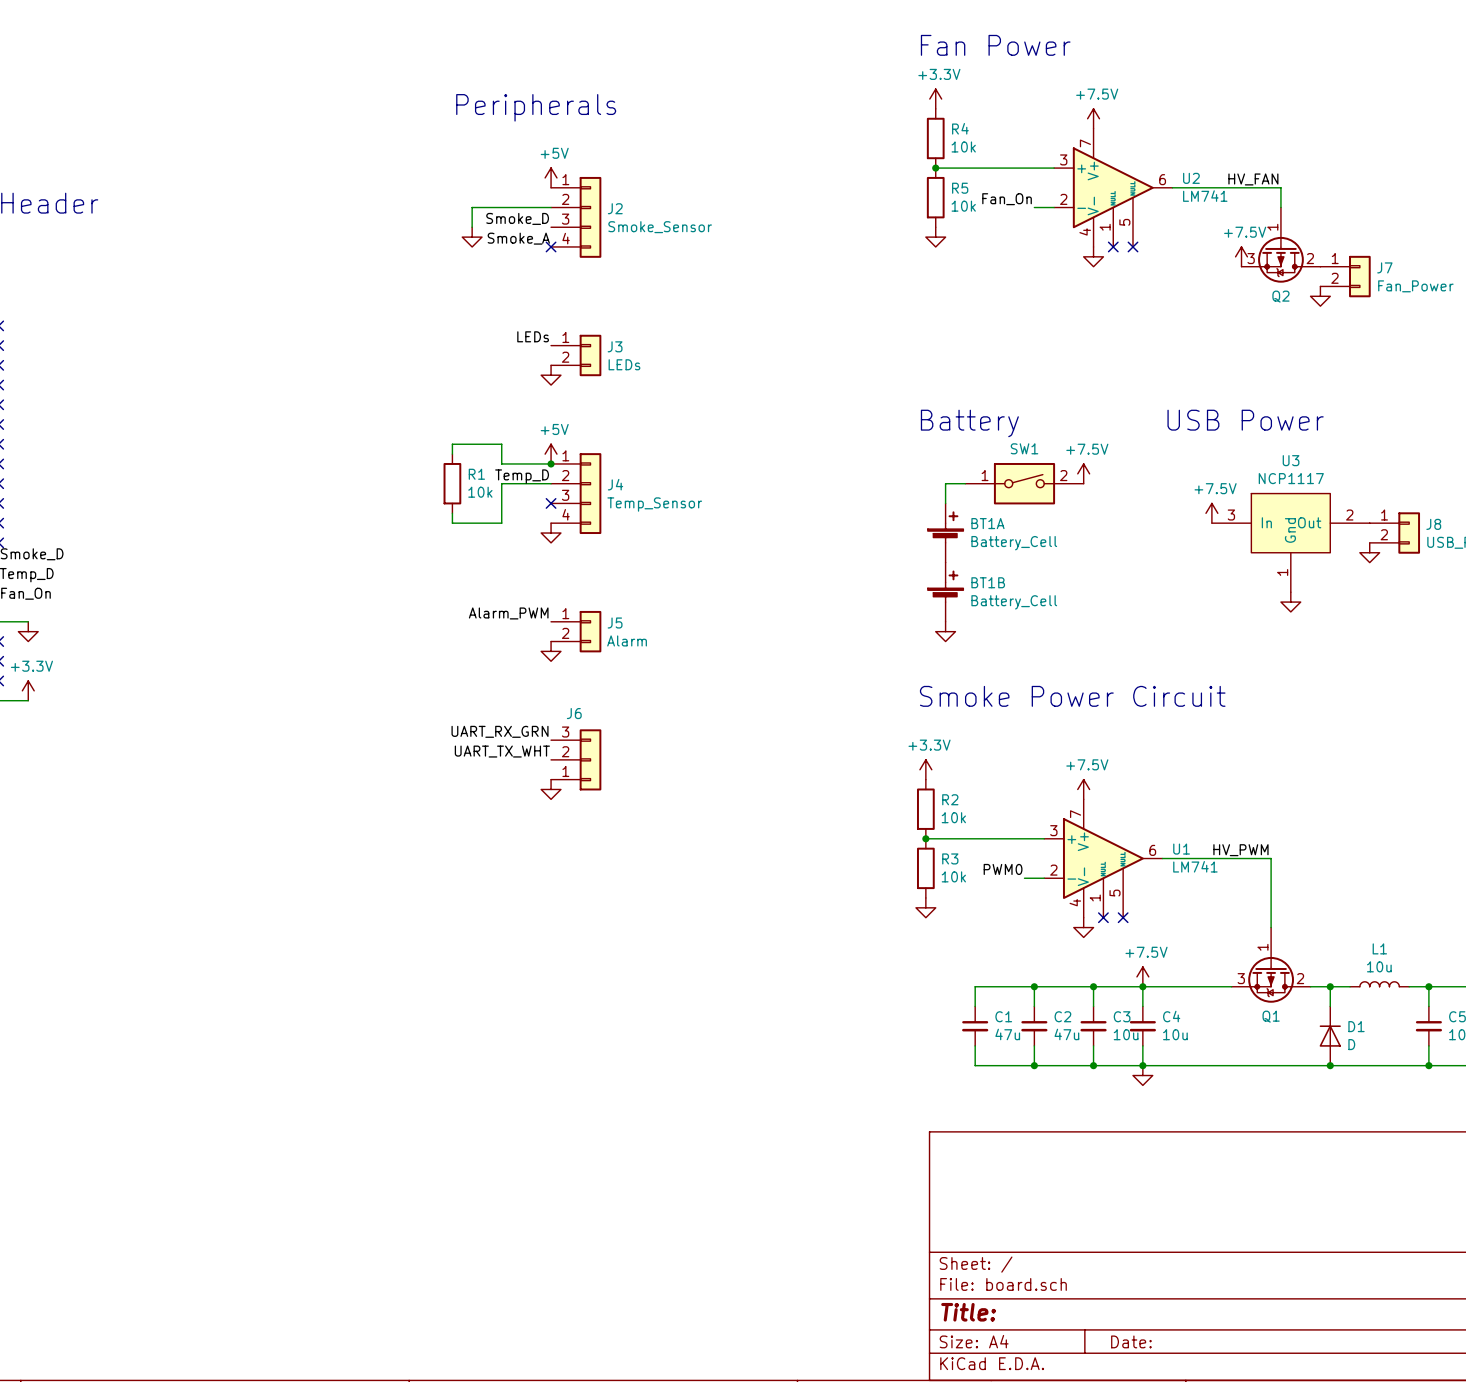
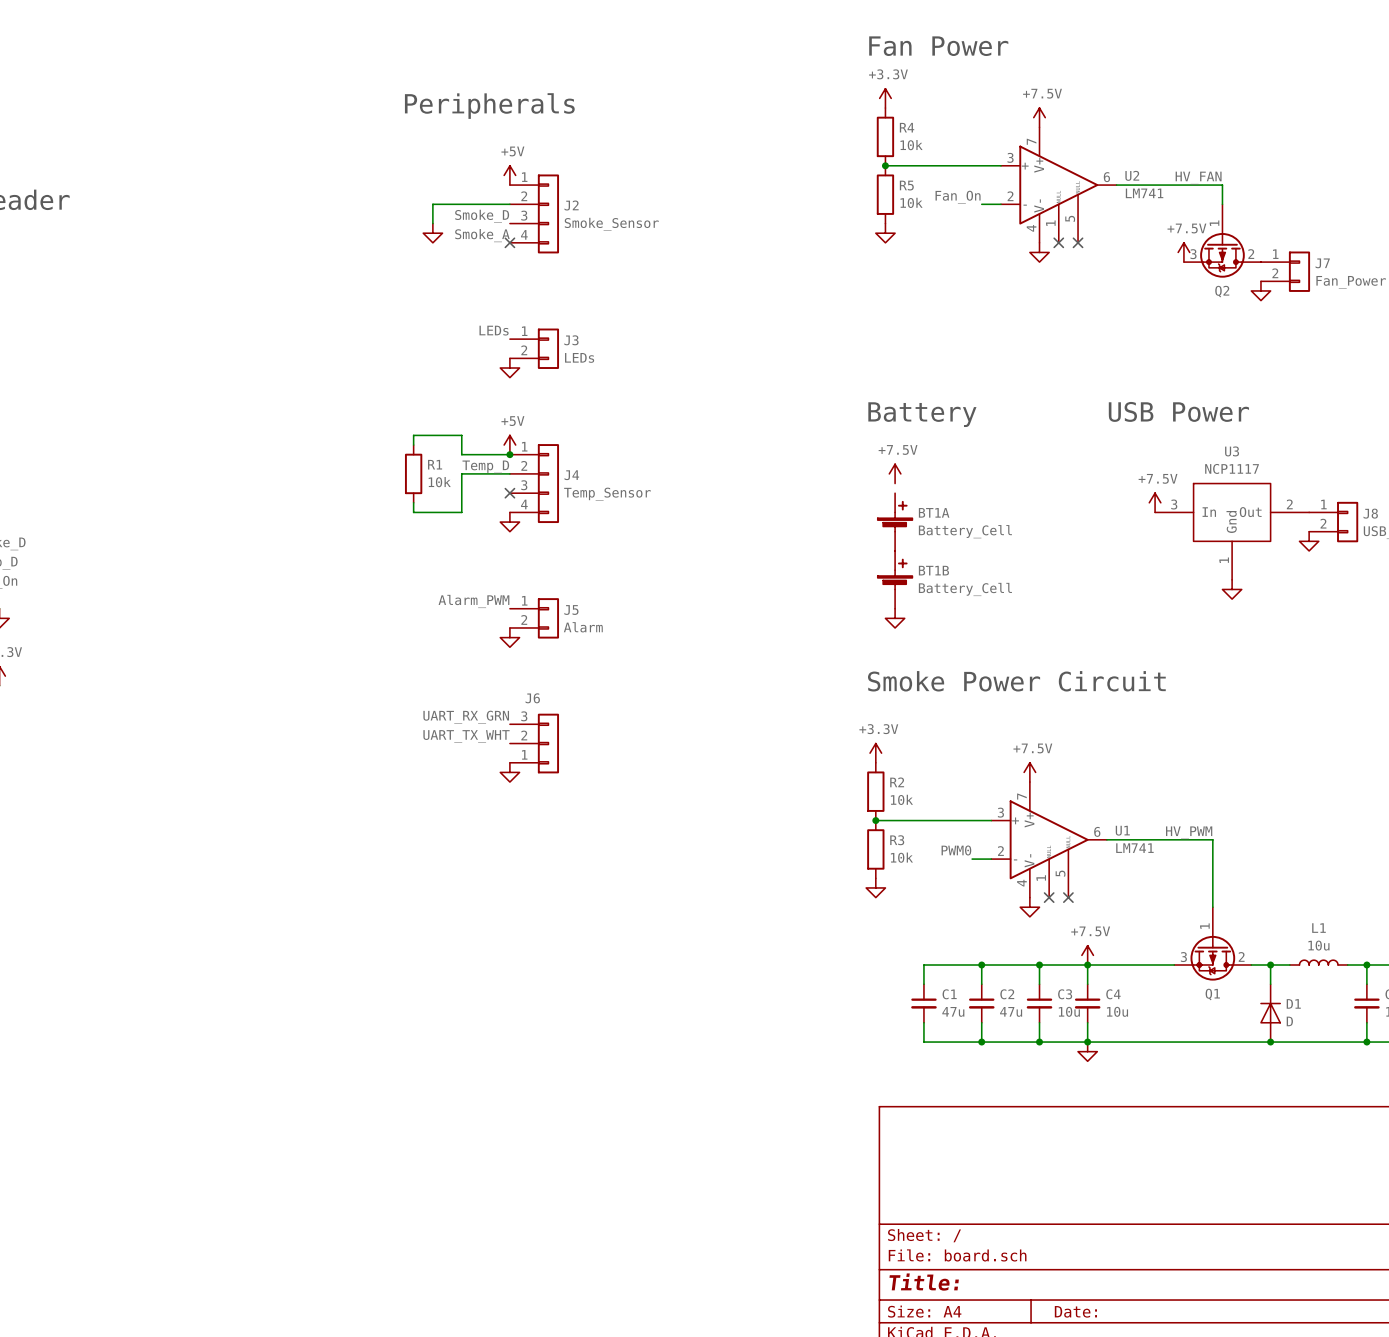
power symbol position: +7.5V (1083, 473) -> +7.5V (895, 473)
wire: (965, 483) (945, 483) (945, 503) -> none
SW1: (1024, 483) -> none

